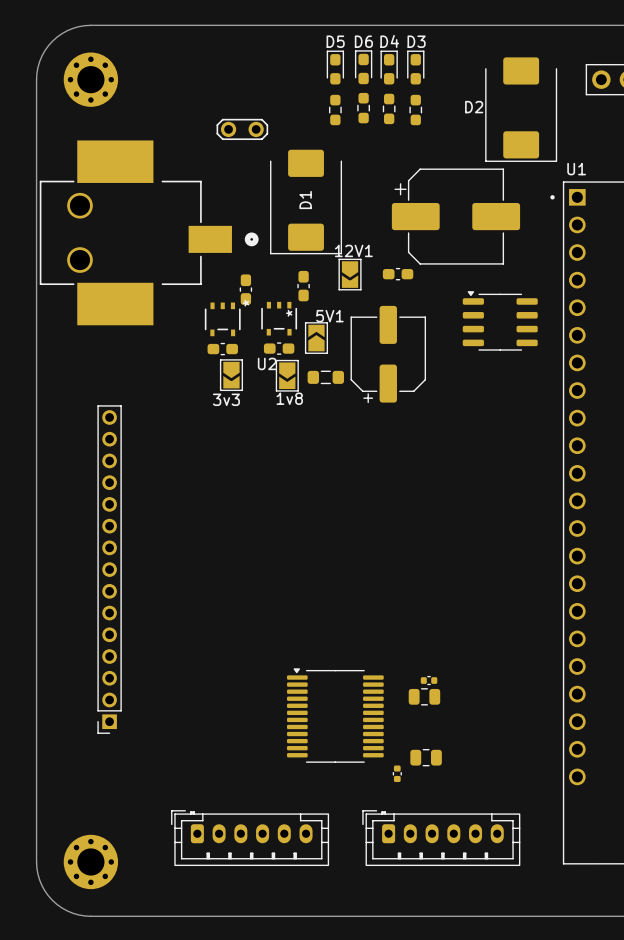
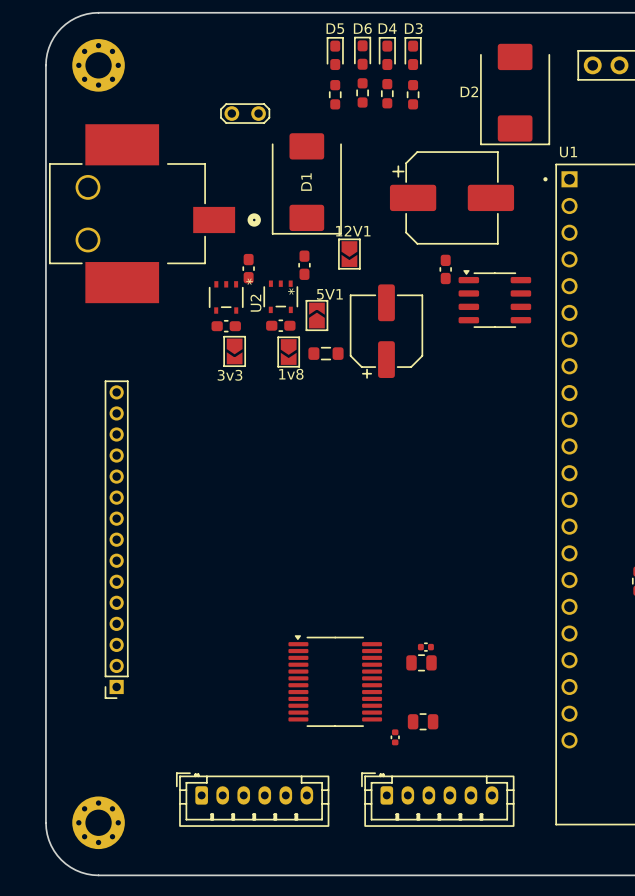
part rotation: 0° (398, 274) -> 90° clockwise (445, 269)
part position: (398, 274) -> (445, 269)
U2 name rotation: 0° (267, 363) -> 90° counterclockwise (255, 303)
U2 name position: U2 (267, 363) -> U2 (255, 303)

